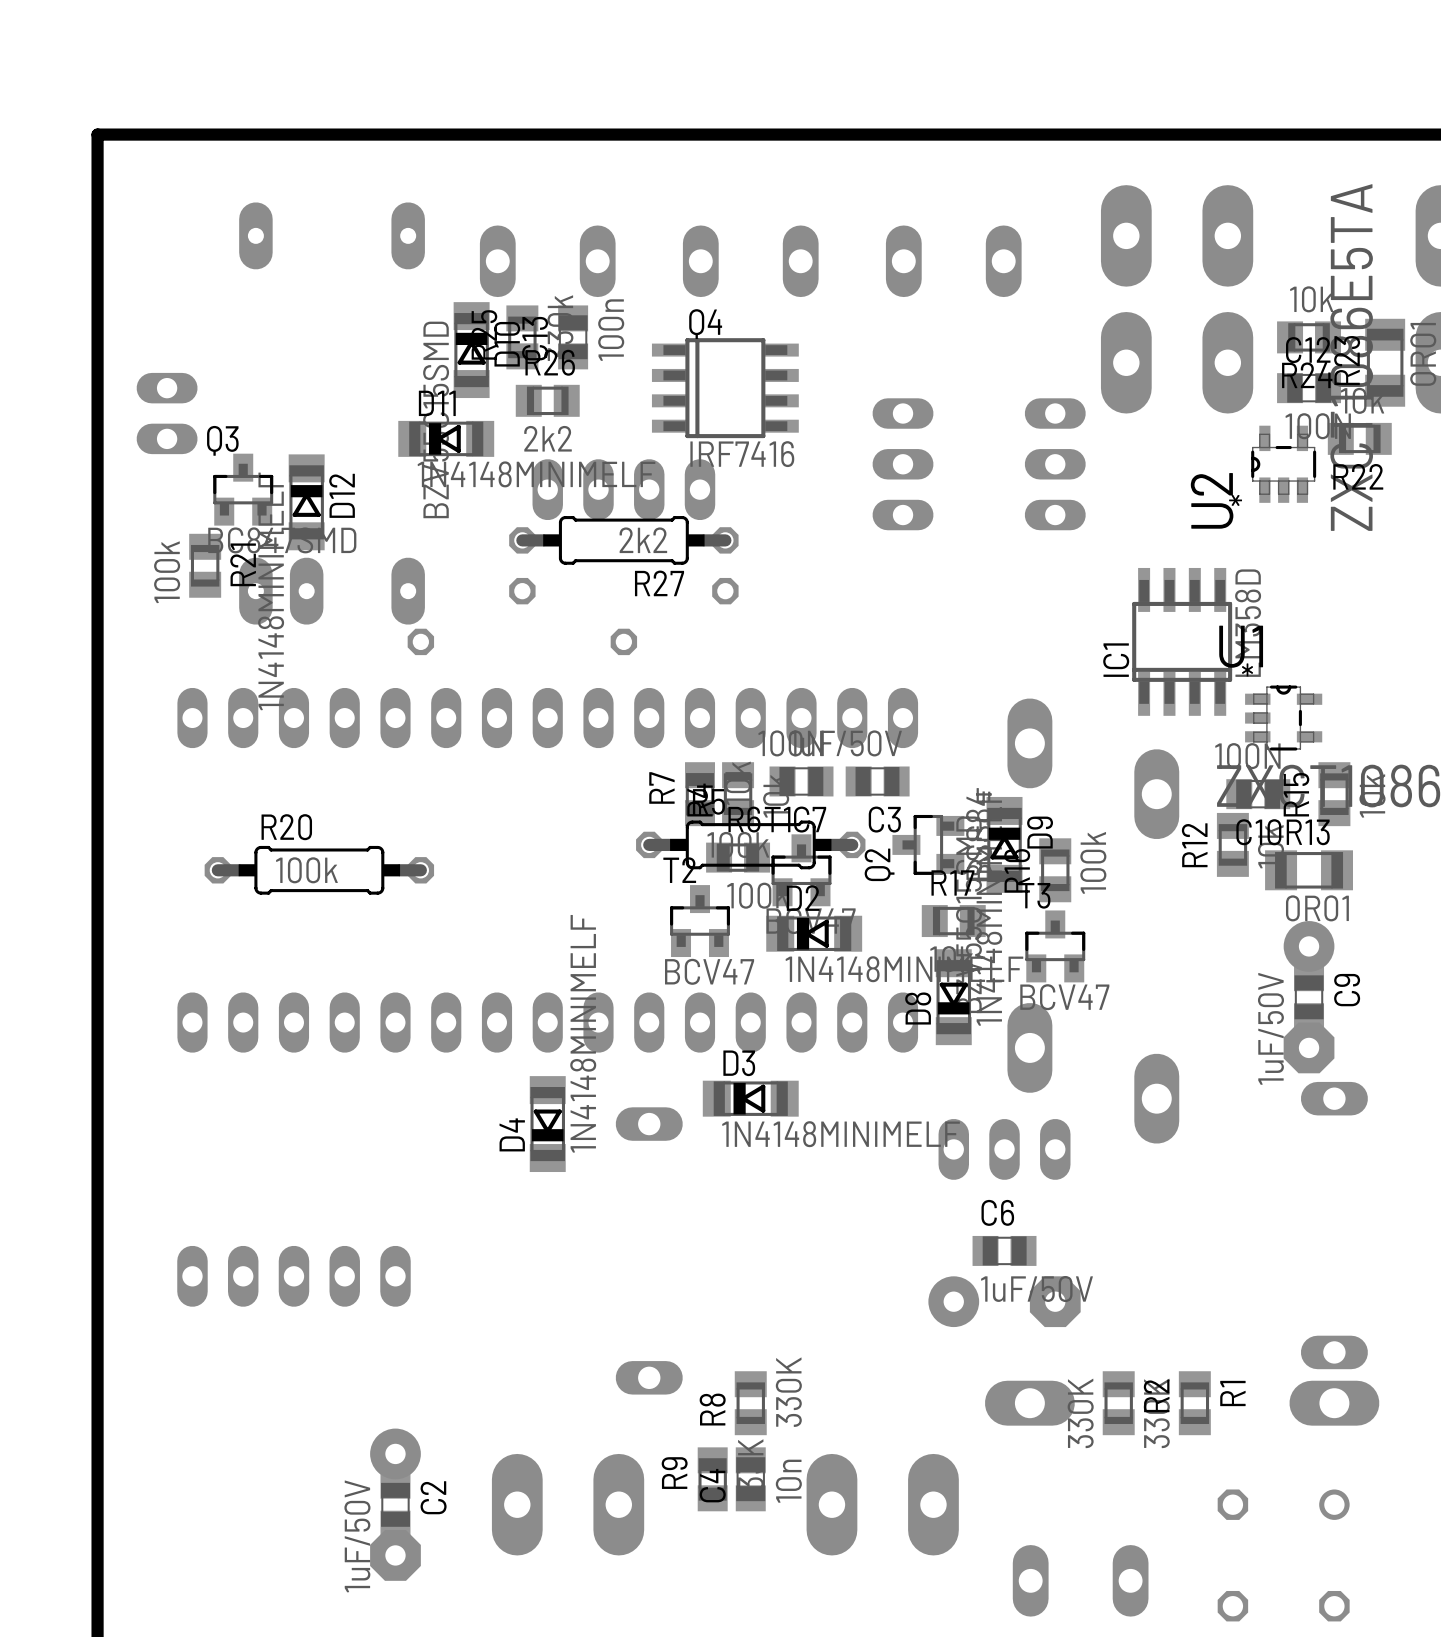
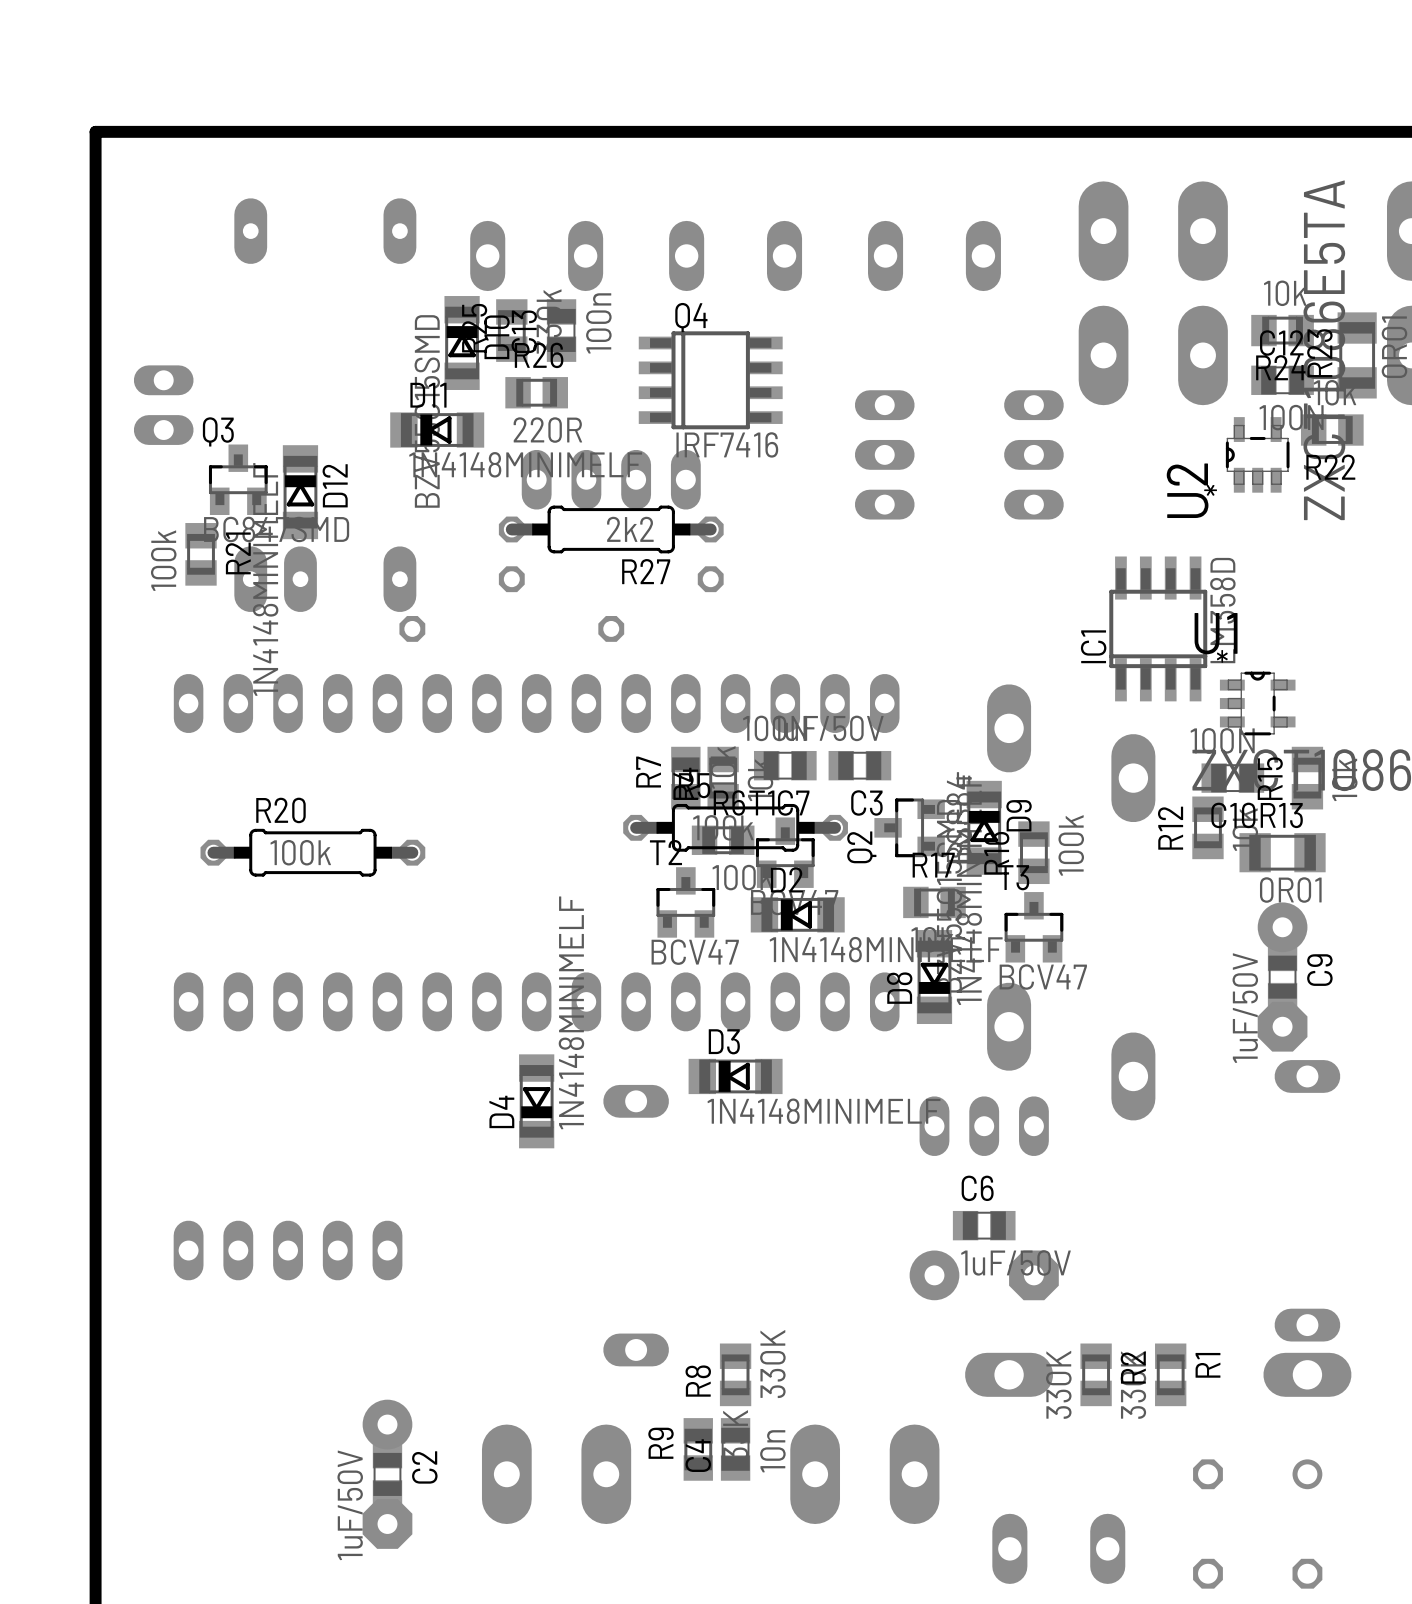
R26 value: 2k2 (548, 438) -> 220R (547, 430)

